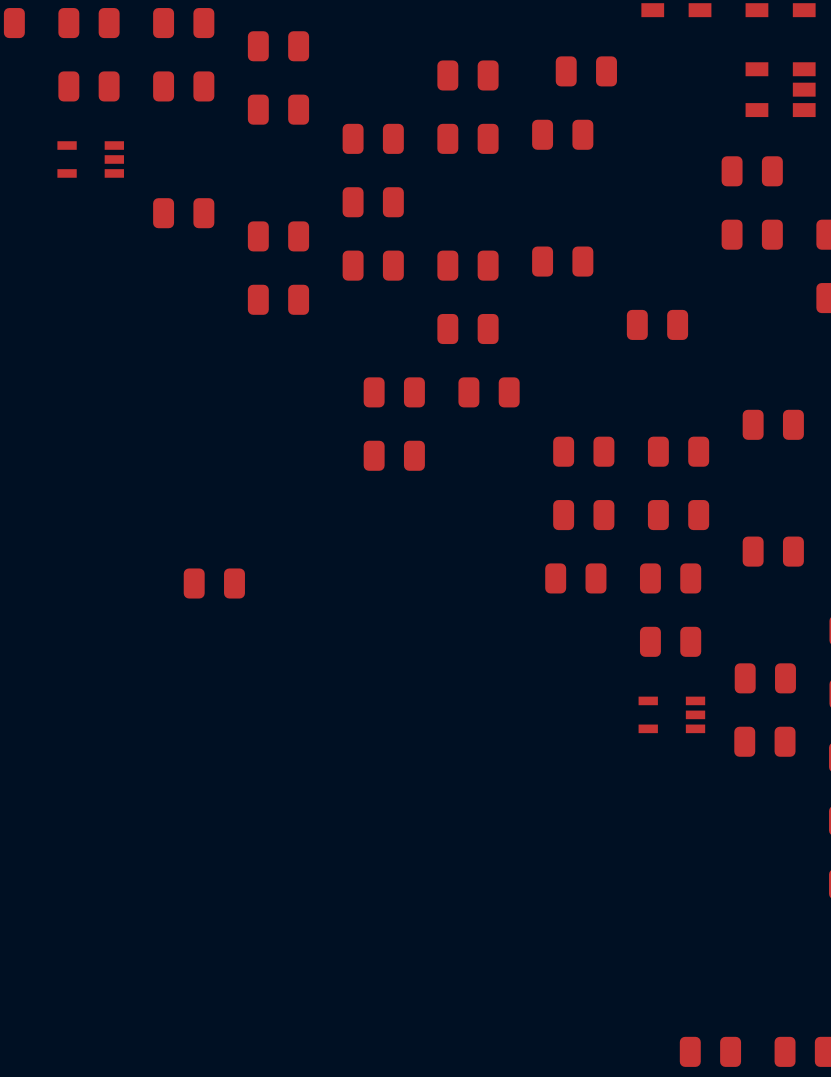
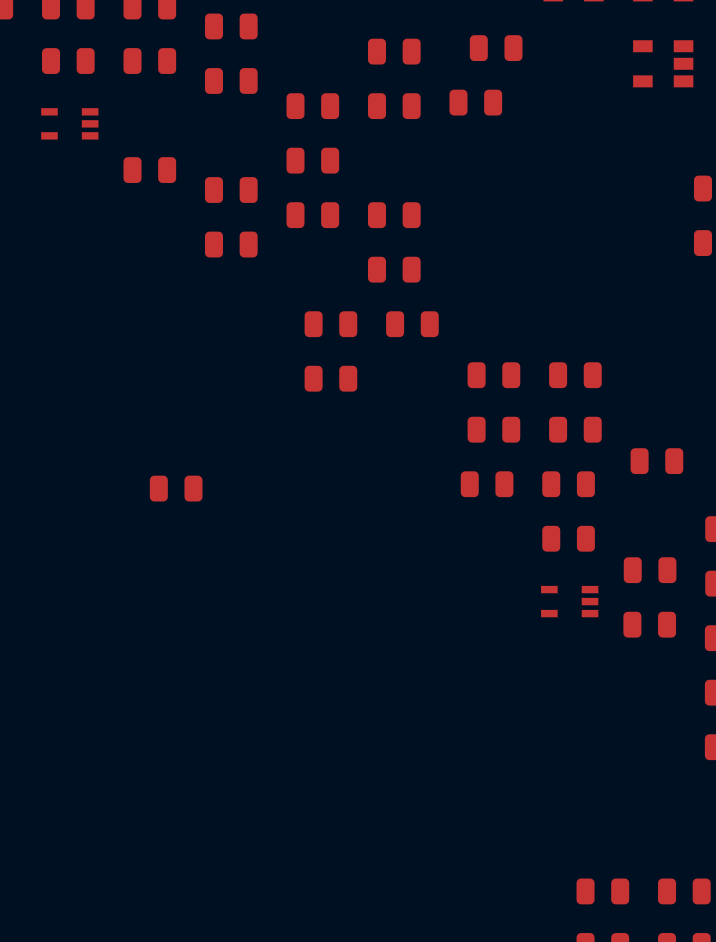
part: (752, 171) -> none
part: (752, 234) -> none
part: (562, 261) -> none
part: (657, 324) -> none
part: (773, 424) -> none

